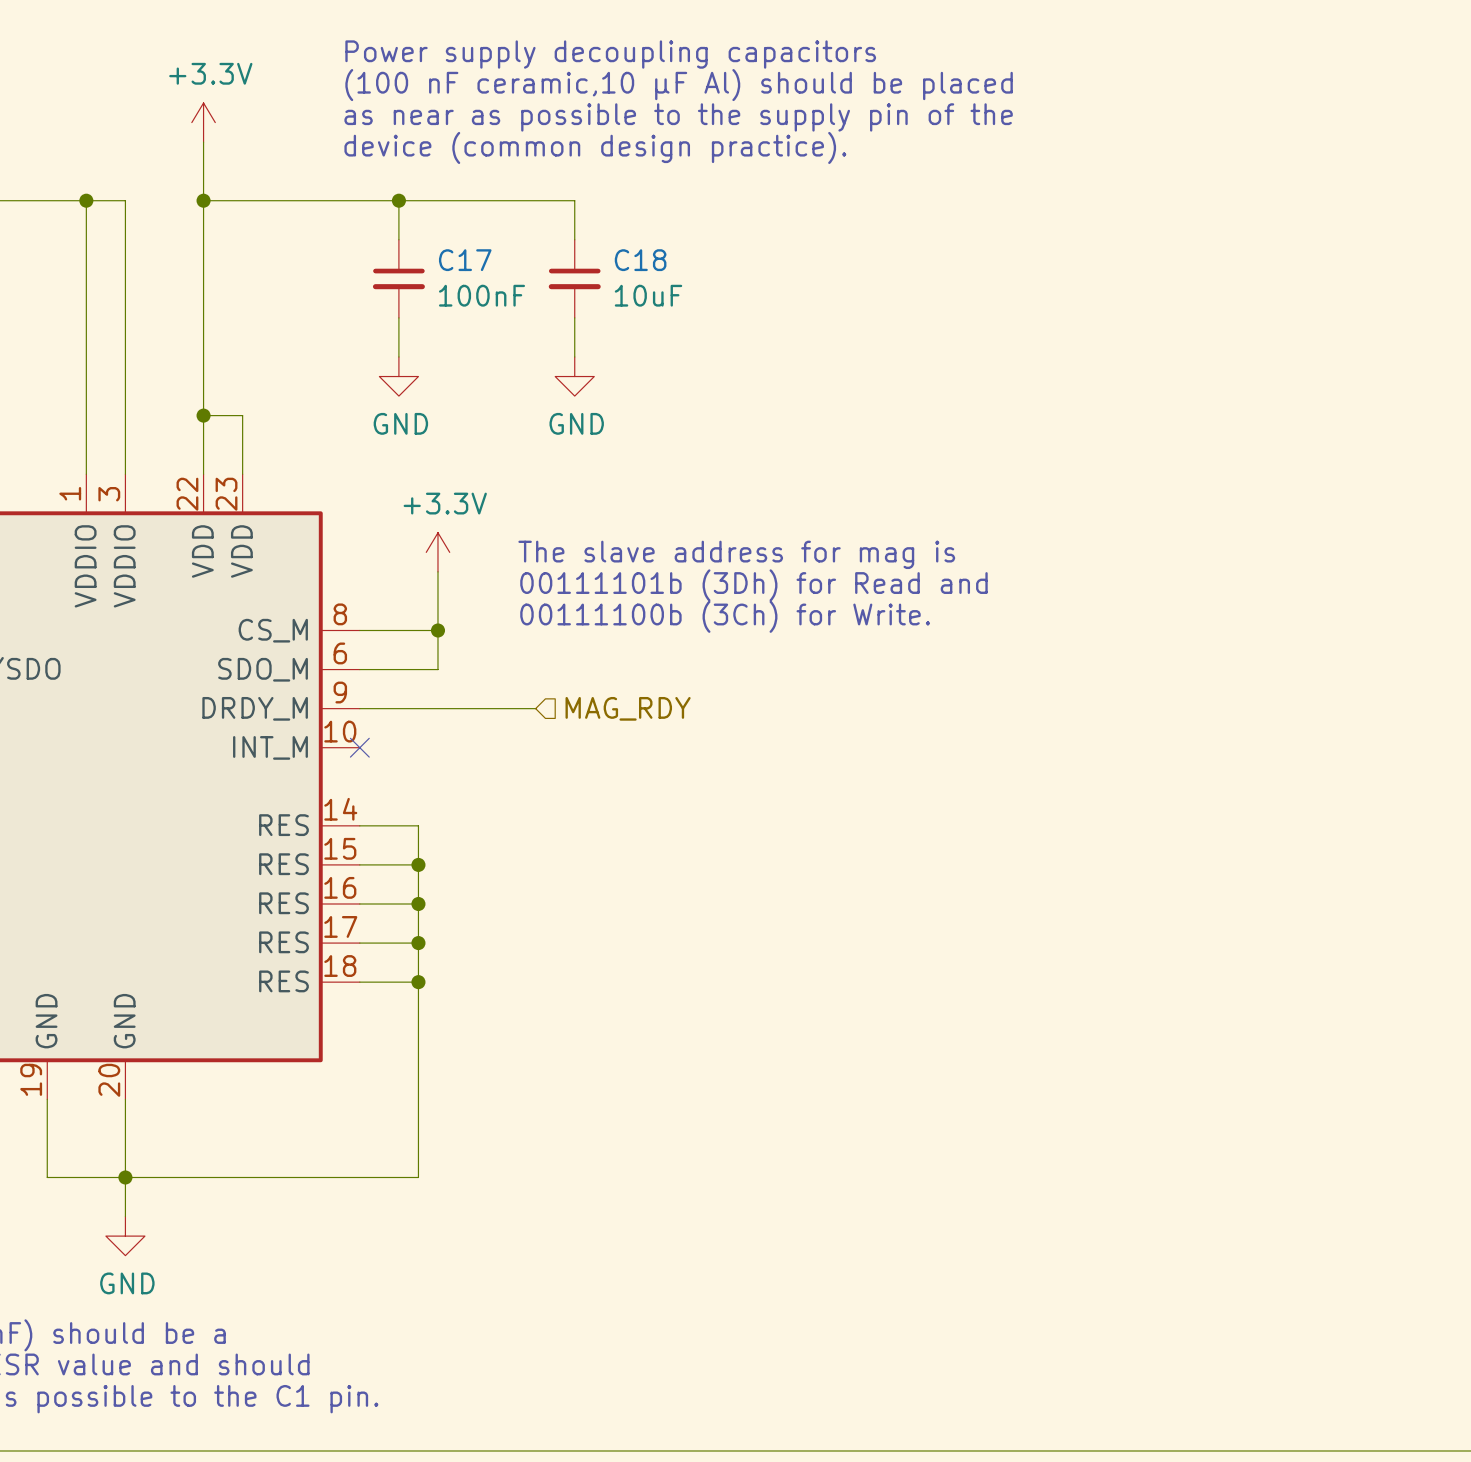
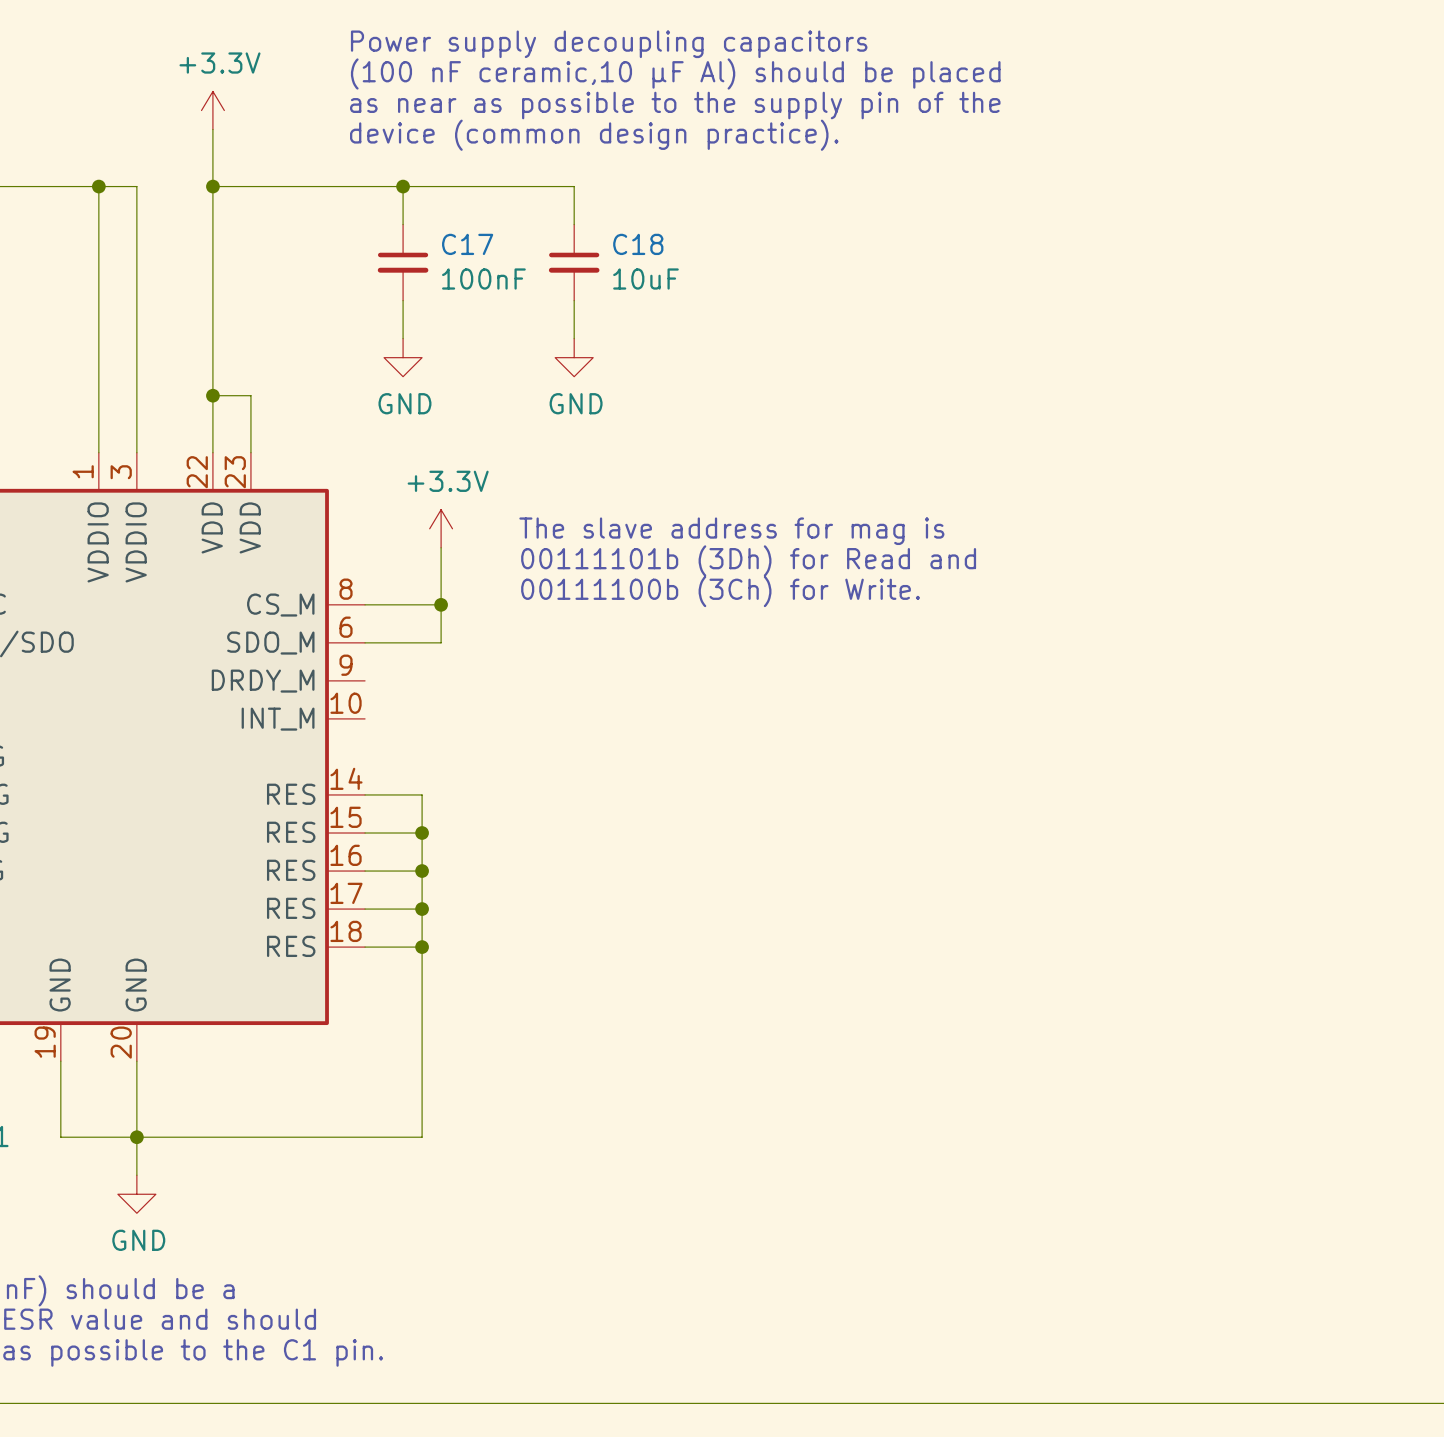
wire: (359, 708) (535, 708) -> none
hierarchical label: MAG_RDY (628, 708) -> none
no-connect mark: (359, 747) -> none

